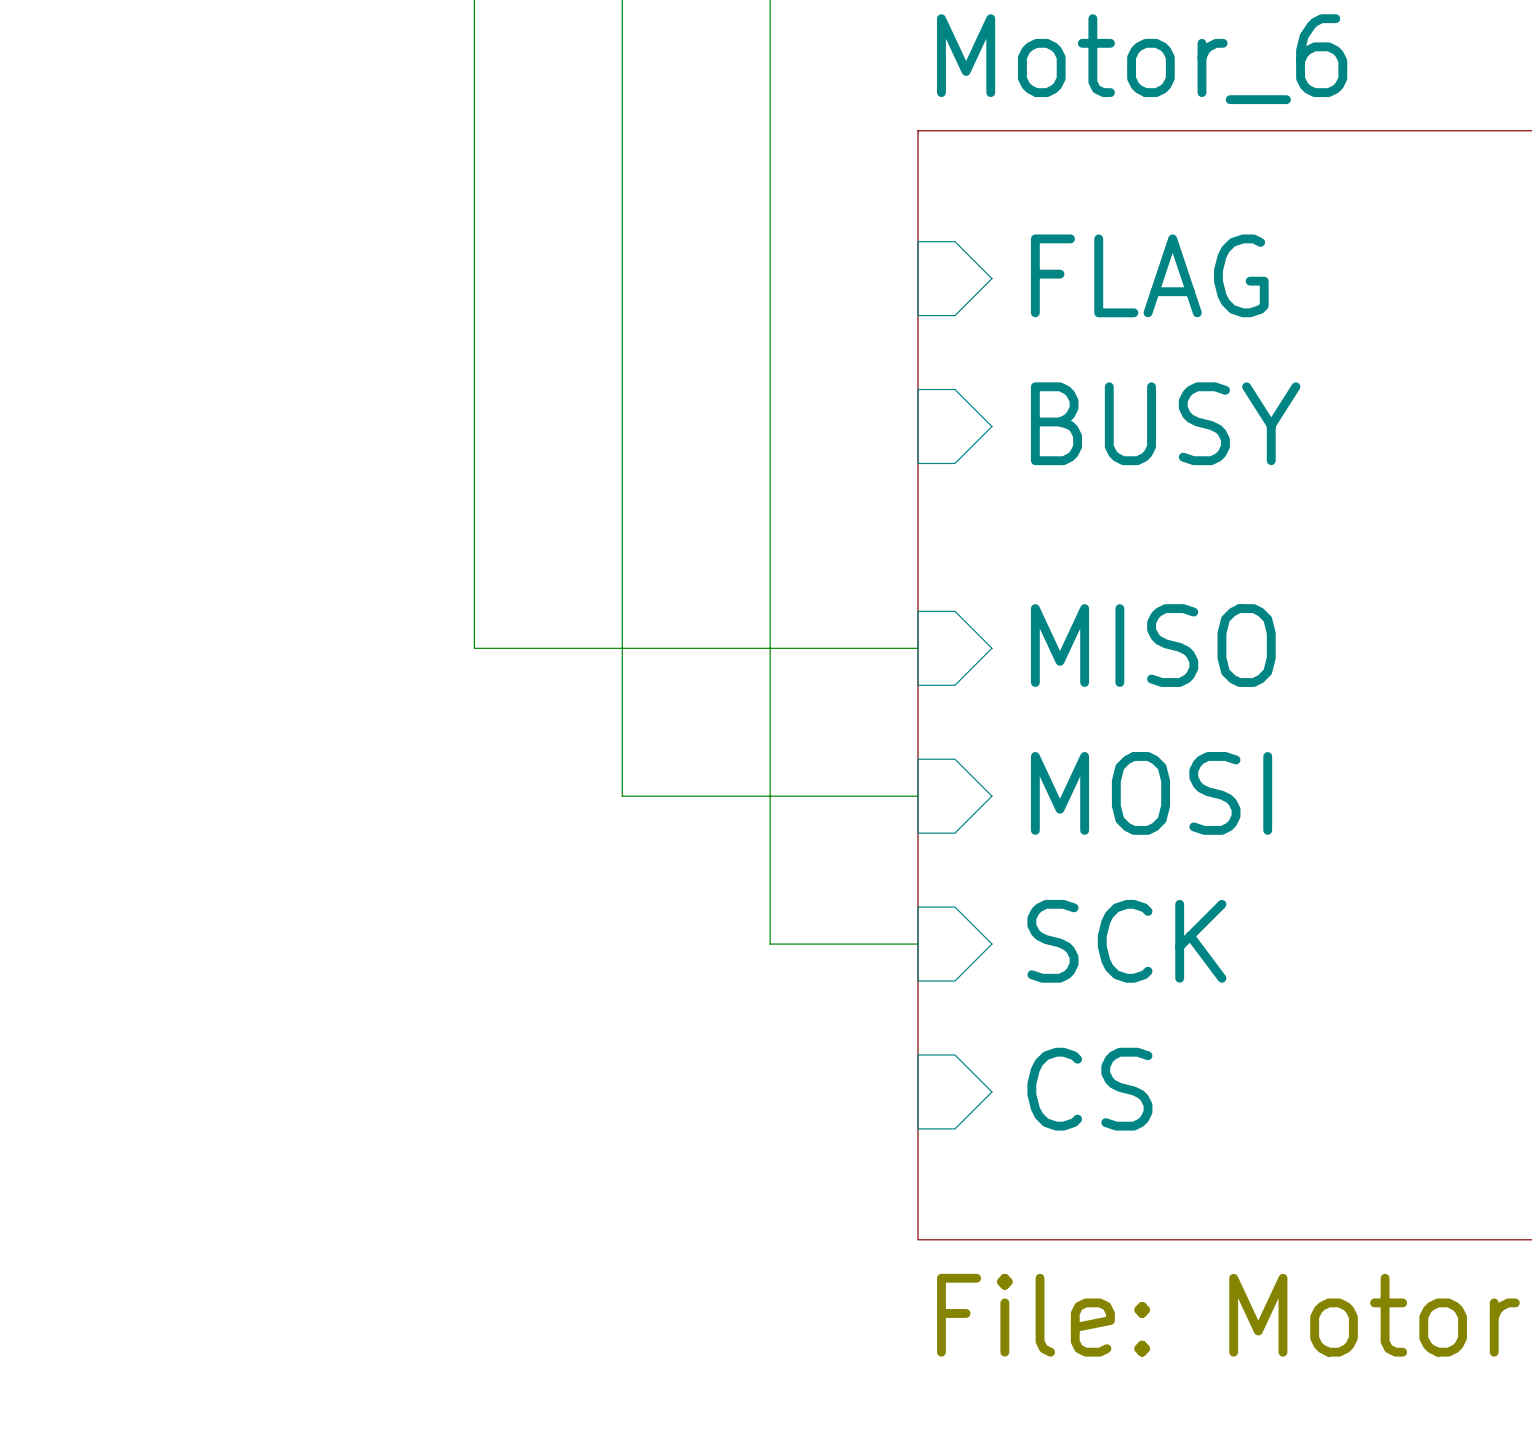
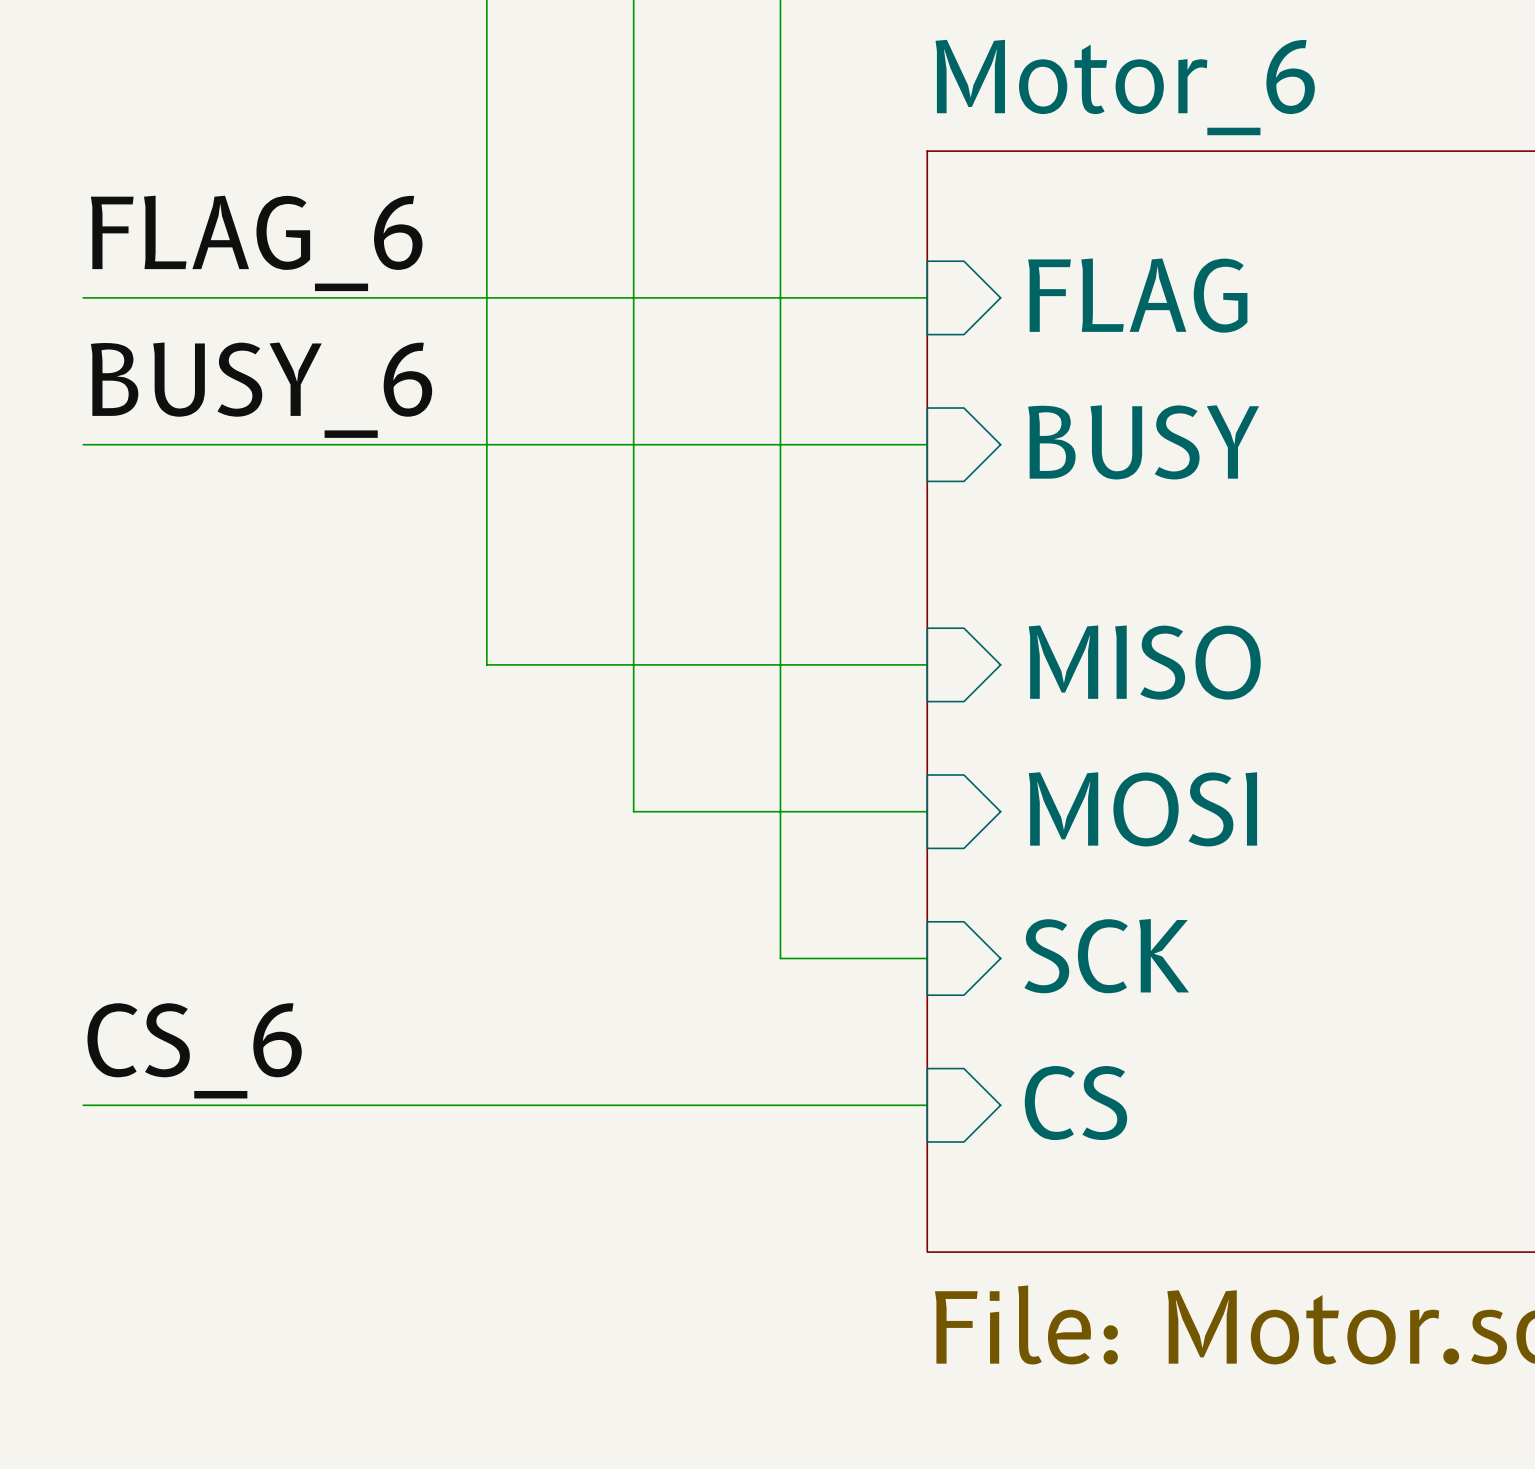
label: none -> FLAG_6 (256, 243)
wire: none -> (83, 297) (927, 297)
label: none -> BUSY_6 (261, 390)
wire: none -> (83, 444) (927, 444)
label: none -> CS_6 (194, 1050)
wire: none -> (83, 1105) (927, 1105)

